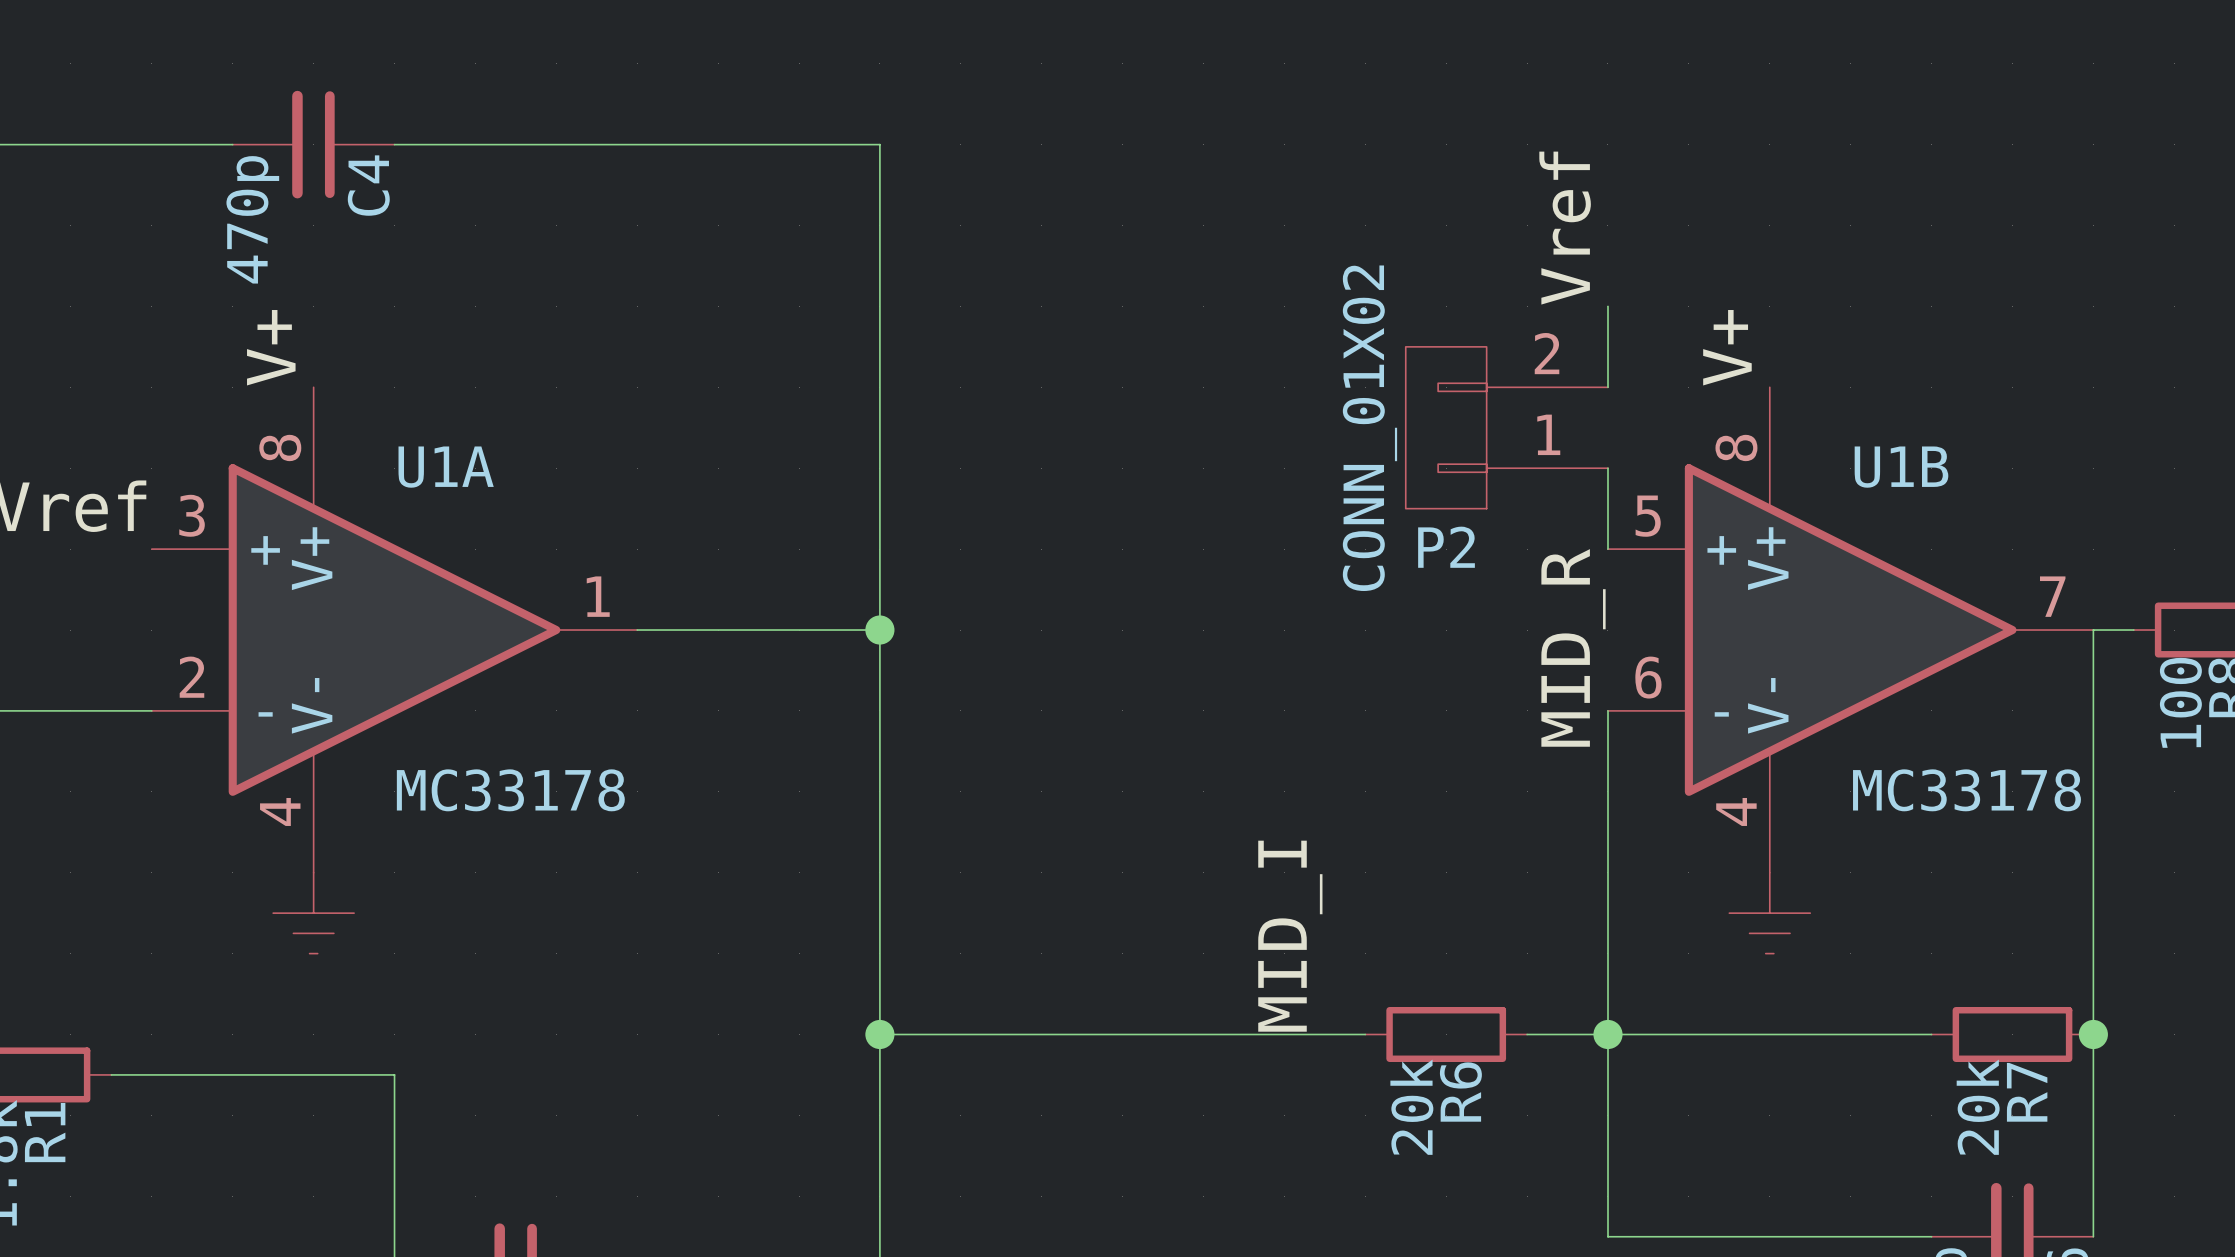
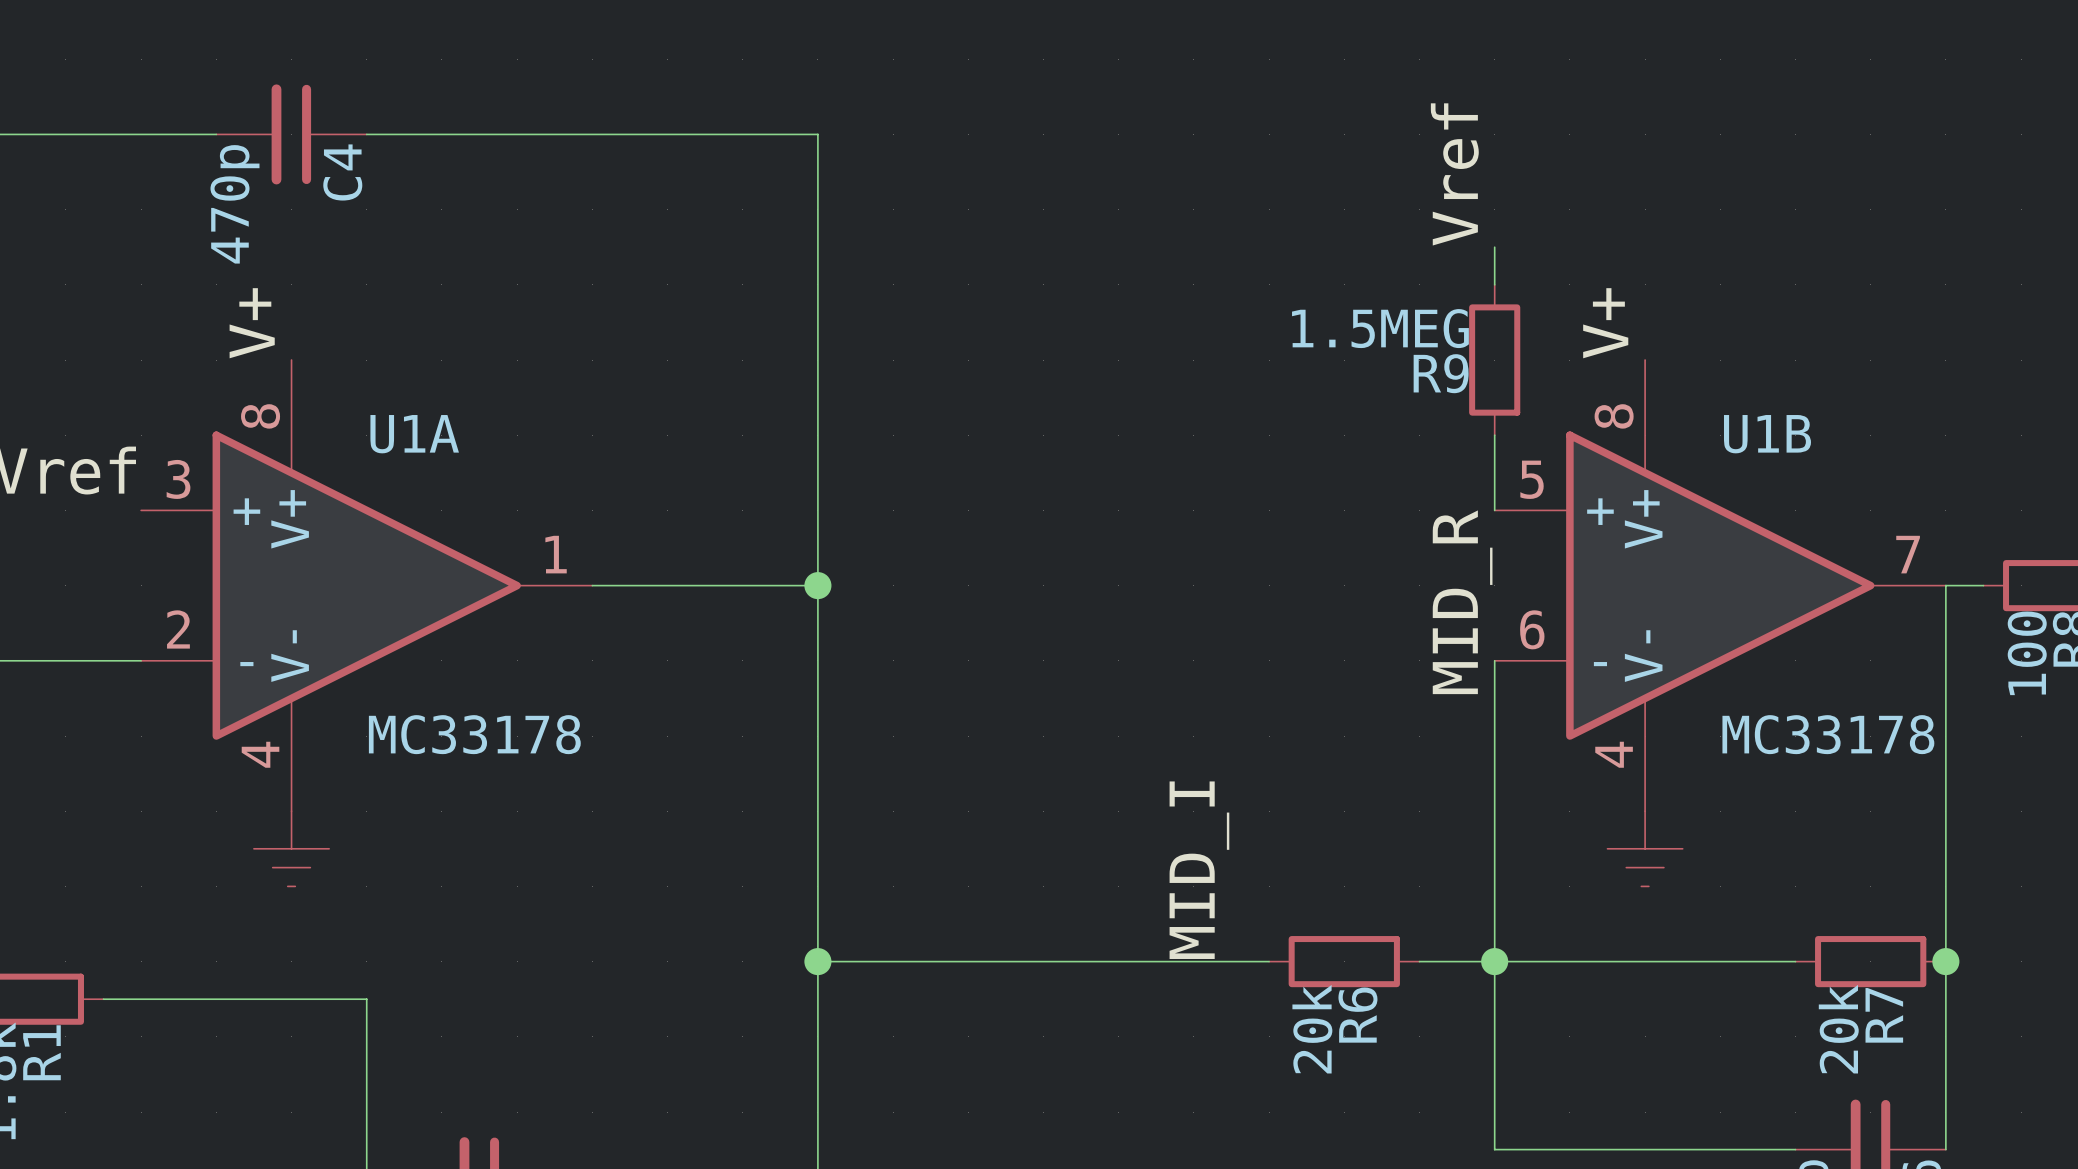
label position: Vref (1565, 228) -> Vref (1454, 174)
wire: (1607, 306) (1607, 387) -> (1494, 284) (1494, 247)
R9: none -> 1.5MEG (1494, 360)
P2: CONN_01X02 (1506, 427) -> none

